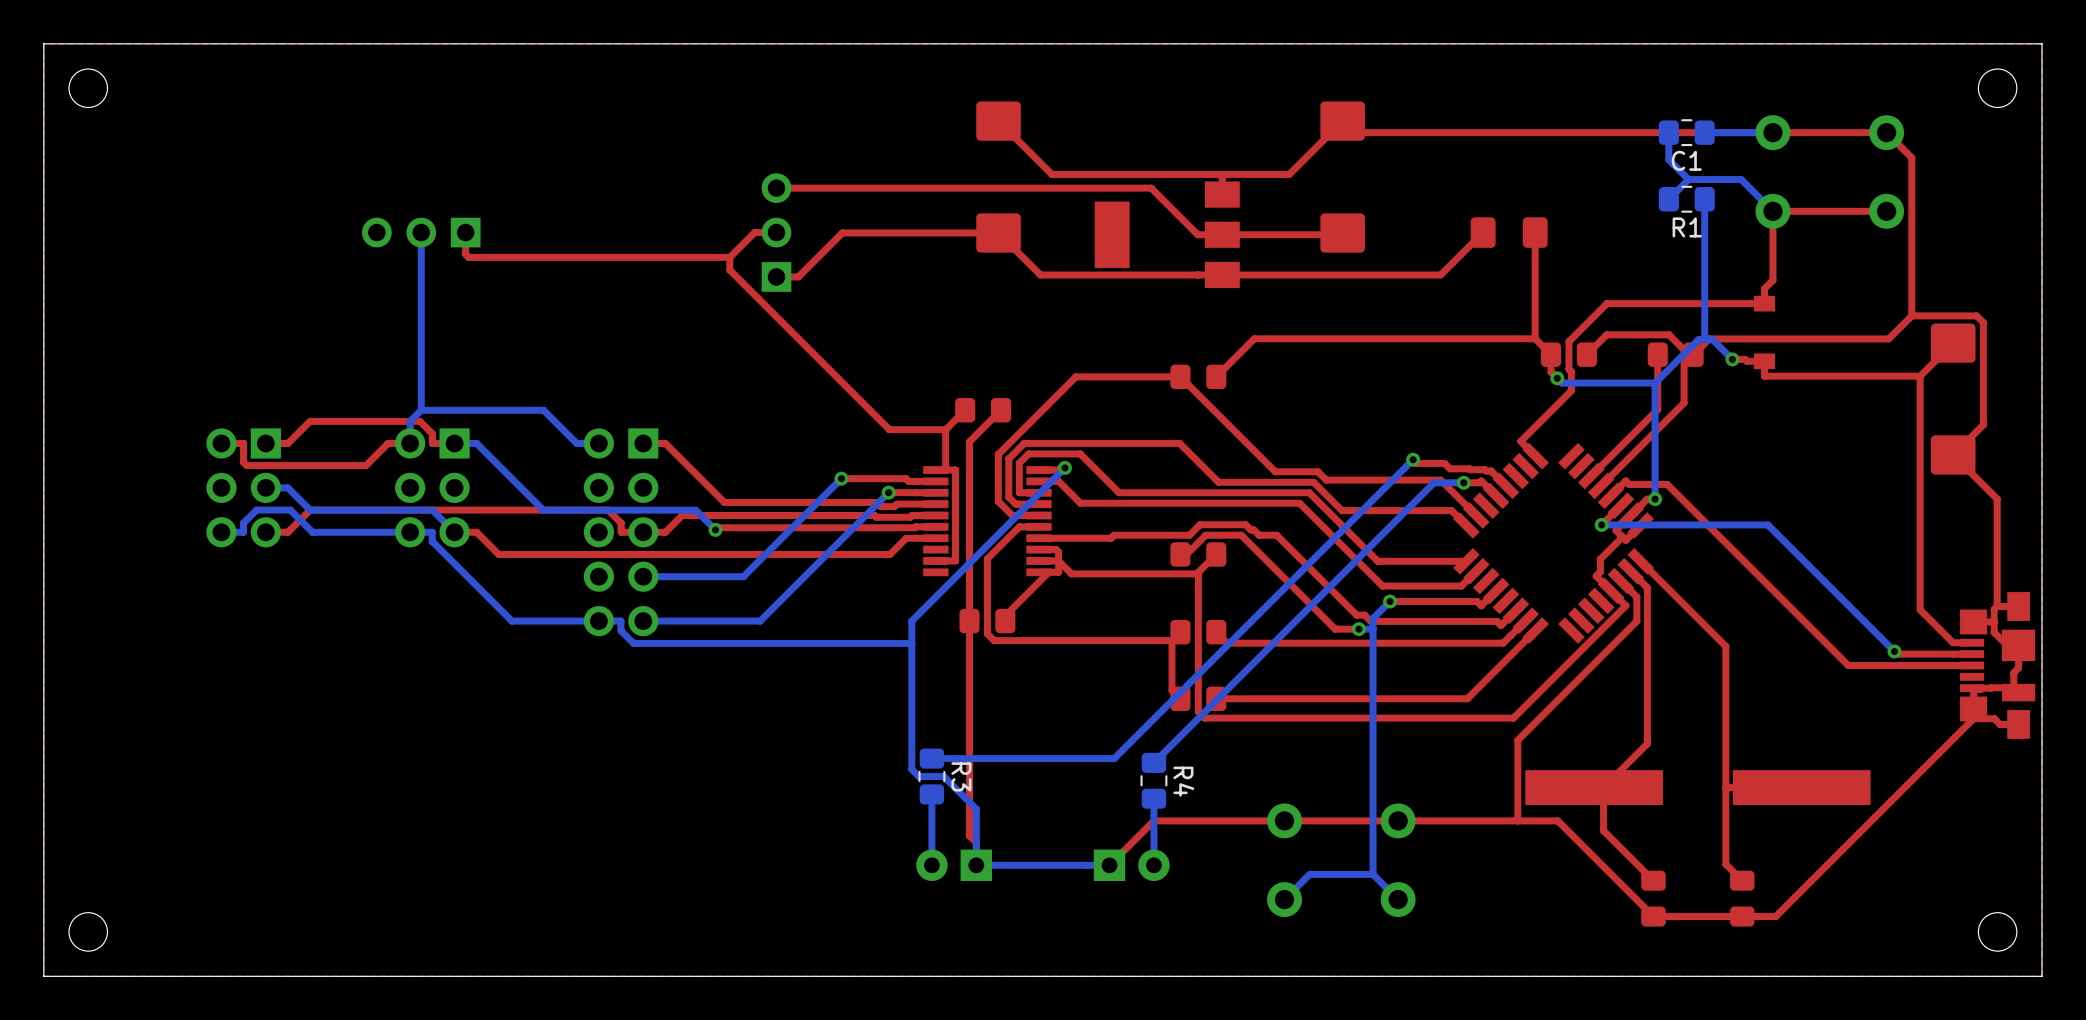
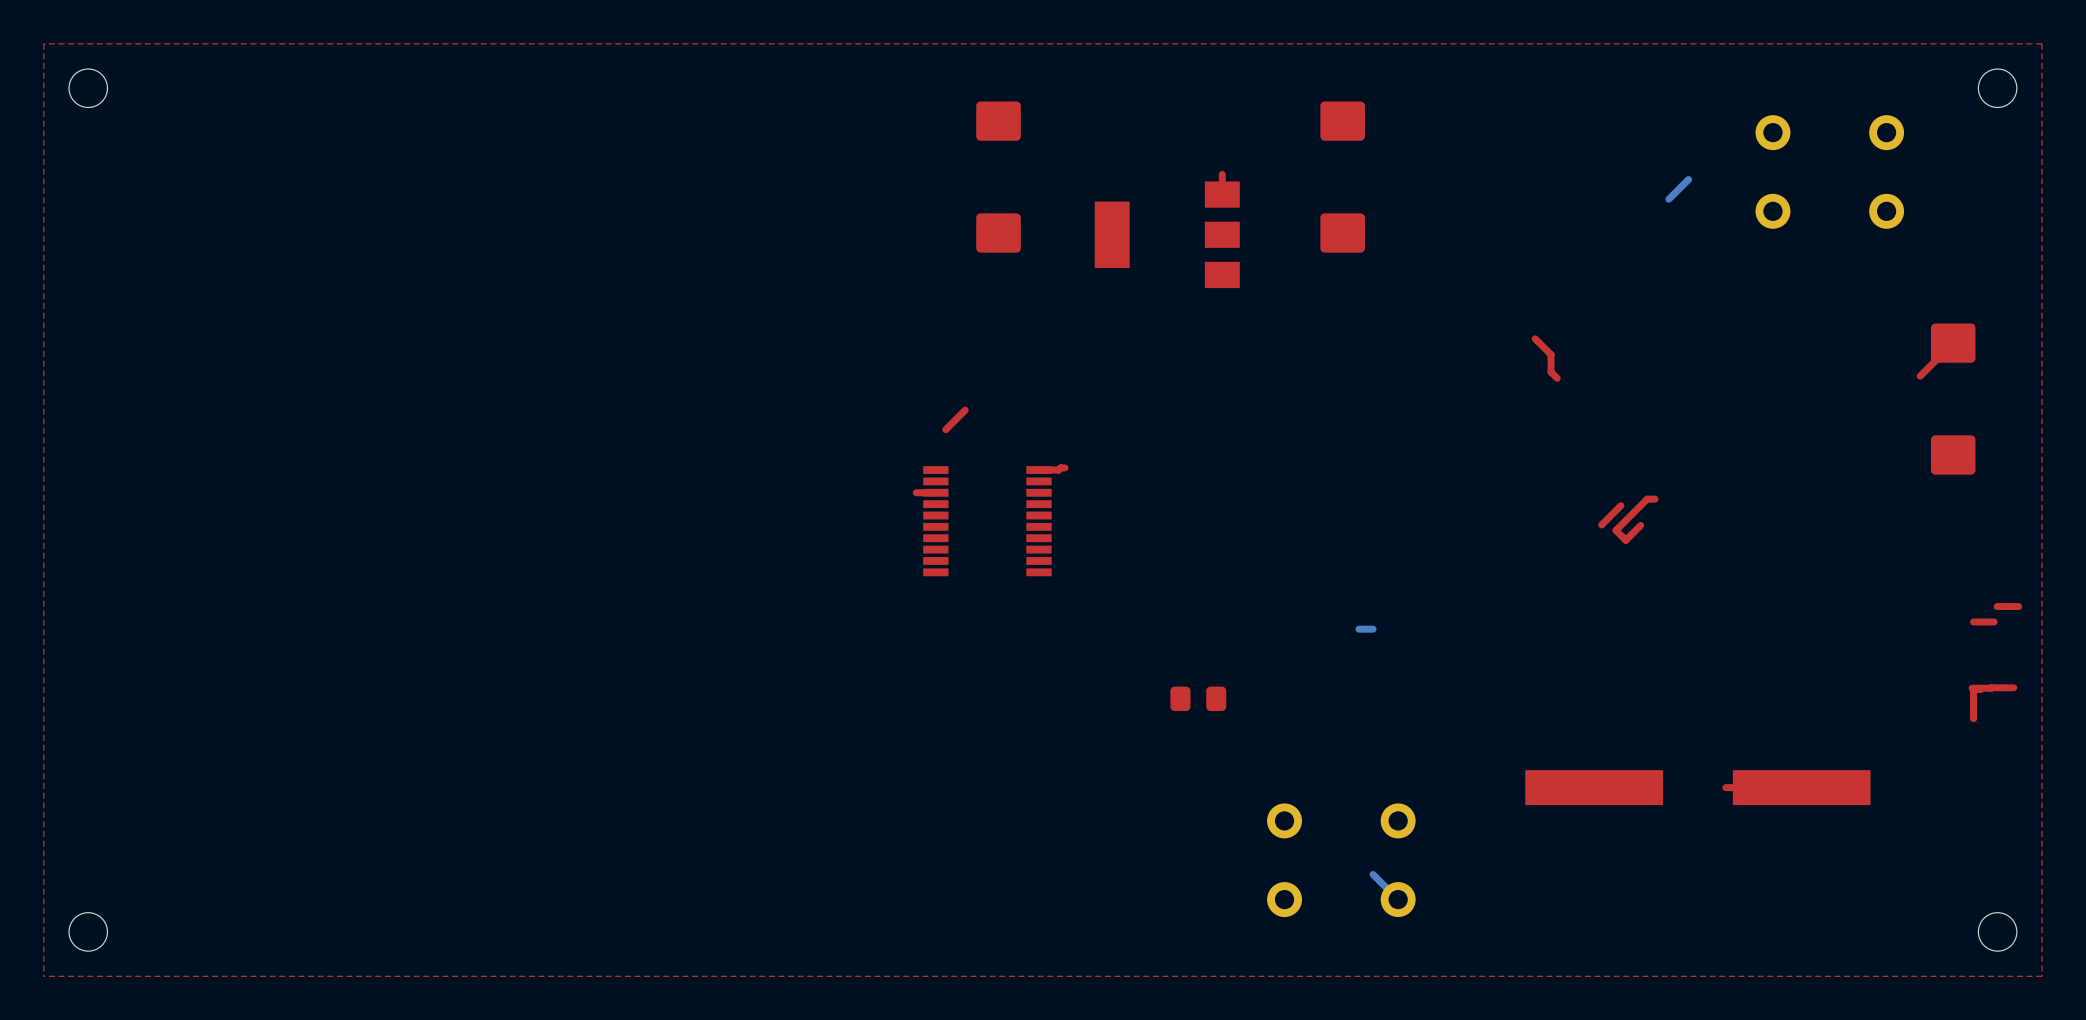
board edge: (2042, 43) (2042, 976) (43, 976) (43, 43) (2042, 43) -> none
top track: (998, 121) (1051, 174) (1289, 174) (1342, 121) (1354, 132) (1886, 132) (1911, 157) (1911, 315) -> none
bottom track: (1668, 132) (1668, 159) (1688, 179) (1741, 179) (1772, 211) -> none
C1: (1686, 132) -> none
bottom track: (1772, 132) (1704, 132) -> none
top track: (776, 188) (1151, 188) (1197, 234) (1340, 234) (1342, 232) -> none
R1: (1686, 199) -> none
bottom track: (1704, 199) (1704, 339) -> none
top track: (1886, 211) (1772, 211) (1772, 280) (1764, 288) (1764, 303) (1607, 303) (1568, 341) (1571, 390) (1520, 441) (1535, 456) -> none
bottom track: (421, 232) (421, 410) -> none
part: (421, 232) -> none
top track: (465, 232) (465, 254) (468, 257) (729, 257) -> none
top track: (776, 232) (754, 232) (729, 257) -> none
part: (776, 232) -> none
top track: (1483, 232) (1440, 274) (1040, 274) (998, 232) (842, 232) (798, 276) (776, 276) -> none
part: (1509, 232) -> none
top track: (1535, 232) (1535, 338) (1254, 338) (1216, 376) -> none
top track: (729, 257) (729, 270) (889, 429) (945, 429) (945, 470) -> none
top track: (1911, 315) (1888, 338) (1709, 338) (1693, 354) (1684, 354) -> none
top track: (1911, 315) (1976, 315) (1983, 322) (1983, 424) (1953, 455) (1997, 498) (1997, 606) (1994, 609) (1994, 632) (2018, 656) -> none
part: (1764, 332) -> none
part: (1568, 354) -> none
top track: (1586, 354) (1606, 334) (1669, 334) (1684, 349) (1684, 402) (1601, 485) -> none
top track: (1657, 354) (1657, 409) (1591, 476) -> none
part: (1675, 354) -> none
top track: (1732, 359) (1764, 361) (1764, 376) (1920, 376) (1920, 609) (1953, 642) (1972, 642) -> none
bottom track: (1732, 359) (1712, 339) (1698, 339) (1655, 383) -> none
via: (1732, 359) -> none
part: (1198, 376) -> none
bottom track: (1557, 378) (1562, 383) (1655, 383) -> none
via: (1557, 378) -> none
bottom track: (1655, 383) (1655, 499) -> none
bottom track: (421, 410) (410, 421) (410, 443) -> none
bottom track: (421, 410) (543, 410) (576, 443) (598, 443) -> none
part: (983, 410) -> none
top track: (1001, 410) (969, 441) (969, 835) (976, 842) (976, 865) -> none
top track: (410, 443) (388, 443) (365, 465) (246, 465) (243, 462) (243, 443) (221, 443) -> none
top track: (454, 443) (432, 443) (432, 433) (420, 421) (310, 421) (287, 443) (265, 443) -> none
bottom track: (454, 443) (476, 443) (543, 510) (695, 510) (715, 529) -> none
top track: (643, 443) (665, 443) (724, 502) (876, 502) (880, 506) (894, 506) (896, 504) (935, 504) -> none
top track: (1413, 459) (1416, 463) (1444, 463) (1449, 468) (1491, 471) (1505, 485) -> none
bottom track: (1413, 459) (1114, 758) (931, 758) -> none
via: (1413, 459) -> none
bottom track: (1064, 467) (911, 621) (911, 769) (918, 776) (943, 776) (976, 809) (976, 865) (1109, 865) -> none
via: (1064, 467) -> none
top track: (935, 470) (955, 470) (955, 560) (935, 560) -> none
top track: (841, 478) (905, 478) (908, 481) (935, 481) -> none
bottom track: (841, 478) (743, 576) (643, 576) -> none
via: (841, 478) -> none
top track: (1038, 481) (1058, 481) (1080, 503) (1299, 503) (1382, 586) (1461, 586) (1476, 571) -> none
top track: (1463, 482) (1479, 482) (1481, 480) (1496, 495) -> none
bottom track: (1463, 482) (1433, 482) (1153, 762) -> none
via: (1463, 482) -> none
part: (243, 487) -> none
bottom track: (265, 487) (287, 487) (310, 510) (432, 510) (454, 532) -> none
part: (432, 487) -> none
bottom track: (888, 492) (760, 621) (643, 621) -> none
via: (888, 492) -> none
top track: (916, 492) (888, 492) -> none
top track: (1038, 492) (1019, 492) (1019, 463) (1028, 453) (1080, 453) (1119, 492) (1309, 492) (1377, 561) (1466, 561) -> none
top track: (1611, 495) (1625, 480) (1629, 484) (1667, 484) (1848, 665) (1972, 665) -> none
via: (1655, 499) -> none
top track: (1038, 504) (1015, 504) (1008, 497) (1008, 458) (1024, 443) (1179, 443) (1218, 482) (1313, 482) (1341, 510) (1451, 510) (1466, 525) -> none
top track: (935, 515) (912, 515) (910, 517) (682, 515) (665, 532) (621, 532) (621, 523) (608, 510) (310, 510) (287, 532) (265, 532) -> none
top track: (1476, 515) (1440, 480) (1326, 480) (1317, 471) (1275, 471) (1180, 376) (1075, 376) (998, 454) (998, 501) (1012, 515) (1038, 515) -> none
bottom track: (1601, 524) (1767, 524) (1894, 651) -> none
via: (1601, 524) -> none
top track: (935, 526) (717, 527) (715, 529) -> none
top track: (1038, 526) (1019, 526) (987, 558) (987, 633) (994, 640) (1172, 640) -> none
via: (715, 529) -> none
bottom track: (221, 532) (243, 532) (243, 523) (256, 510) (290, 510) (312, 532) (432, 532) (432, 541) (511, 621) (620, 621) (620, 630) (633, 643) (911, 643) -> none
top track: (454, 532) (476, 532) (498, 554) (890, 554) (906, 538) (935, 538) -> none
part: (621, 532) -> none
top track: (1622, 536) (1600, 559) (1600, 571) (1596, 576) (1625, 605) (1513, 718) (1204, 718) (1198, 711) (1198, 572) (1216, 554) -> none
top track: (1038, 538) (1111, 538) (1114, 535) (1189, 535) (1200, 524) (1245, 524) (1259, 535) (1276, 535) (1356, 615) (1364, 615) (1370, 621) (1496, 621) (1501, 625) (1515, 610) -> none
part: (1553, 543) -> none
top track: (1038, 549) (1056, 549) (1058, 552) (1058, 572) (1038, 572) -> none
top track: (1180, 554) (1186, 554) (1205, 535) (1241, 535) (1335, 629) (1358, 629) -> none
part: (1198, 554) -> none
top track: (1038, 560) (1058, 560) (1071, 573) (1198, 573) -> none
top track: (1640, 561) (1725, 646) (1725, 864) (1742, 880) -> none
top track: (1630, 571) (1647, 587) (1647, 743) (1603, 787) -> none
top track: (1048, 572) (1005, 615) (1005, 621) -> none
top track: (1620, 581) (1636, 597) (1636, 621) (1517, 740) (1517, 820) -> none
top track: (1496, 590) (1481, 605) (1476, 601) (1390, 601) -> none
bottom track: (1390, 601) (1373, 618) (1373, 874) (1309, 874) (1284, 899) -> none
via: (1390, 601) -> none
top track: (1525, 620) (1503, 643) (1227, 643) (1216, 632) -> none
part: (987, 621) -> none
via: (1358, 629) -> none
top track: (1535, 630) (1467, 698) (1216, 698) -> none
part: (1198, 632) -> none
top track: (1172, 640) (1172, 690) (1180, 698) -> none
top track: (2018, 645) (2018, 668) (2013, 672) (2013, 687) (2018, 692) -> none
top track: (1894, 651) (1897, 654) (1972, 654) -> none
via: (1894, 651) -> none
part: (1997, 665) -> none
top track: (2018, 724) (2000, 724) (1994, 718) (1973, 718) (1775, 916) (1653, 916) (1557, 820) (1153, 820) (1109, 865) -> none
R3: (931, 776) -> none
R4: (1153, 780) -> none
top track: (1603, 787) (1603, 830) (1653, 880) -> none
bottom track: (931, 794) (931, 865) -> none
bottom track: (1153, 798) (1153, 865) -> none
part: (954, 865) -> none
part: (1131, 865) -> none
part: (1653, 898) -> none
part: (1742, 898) -> none

